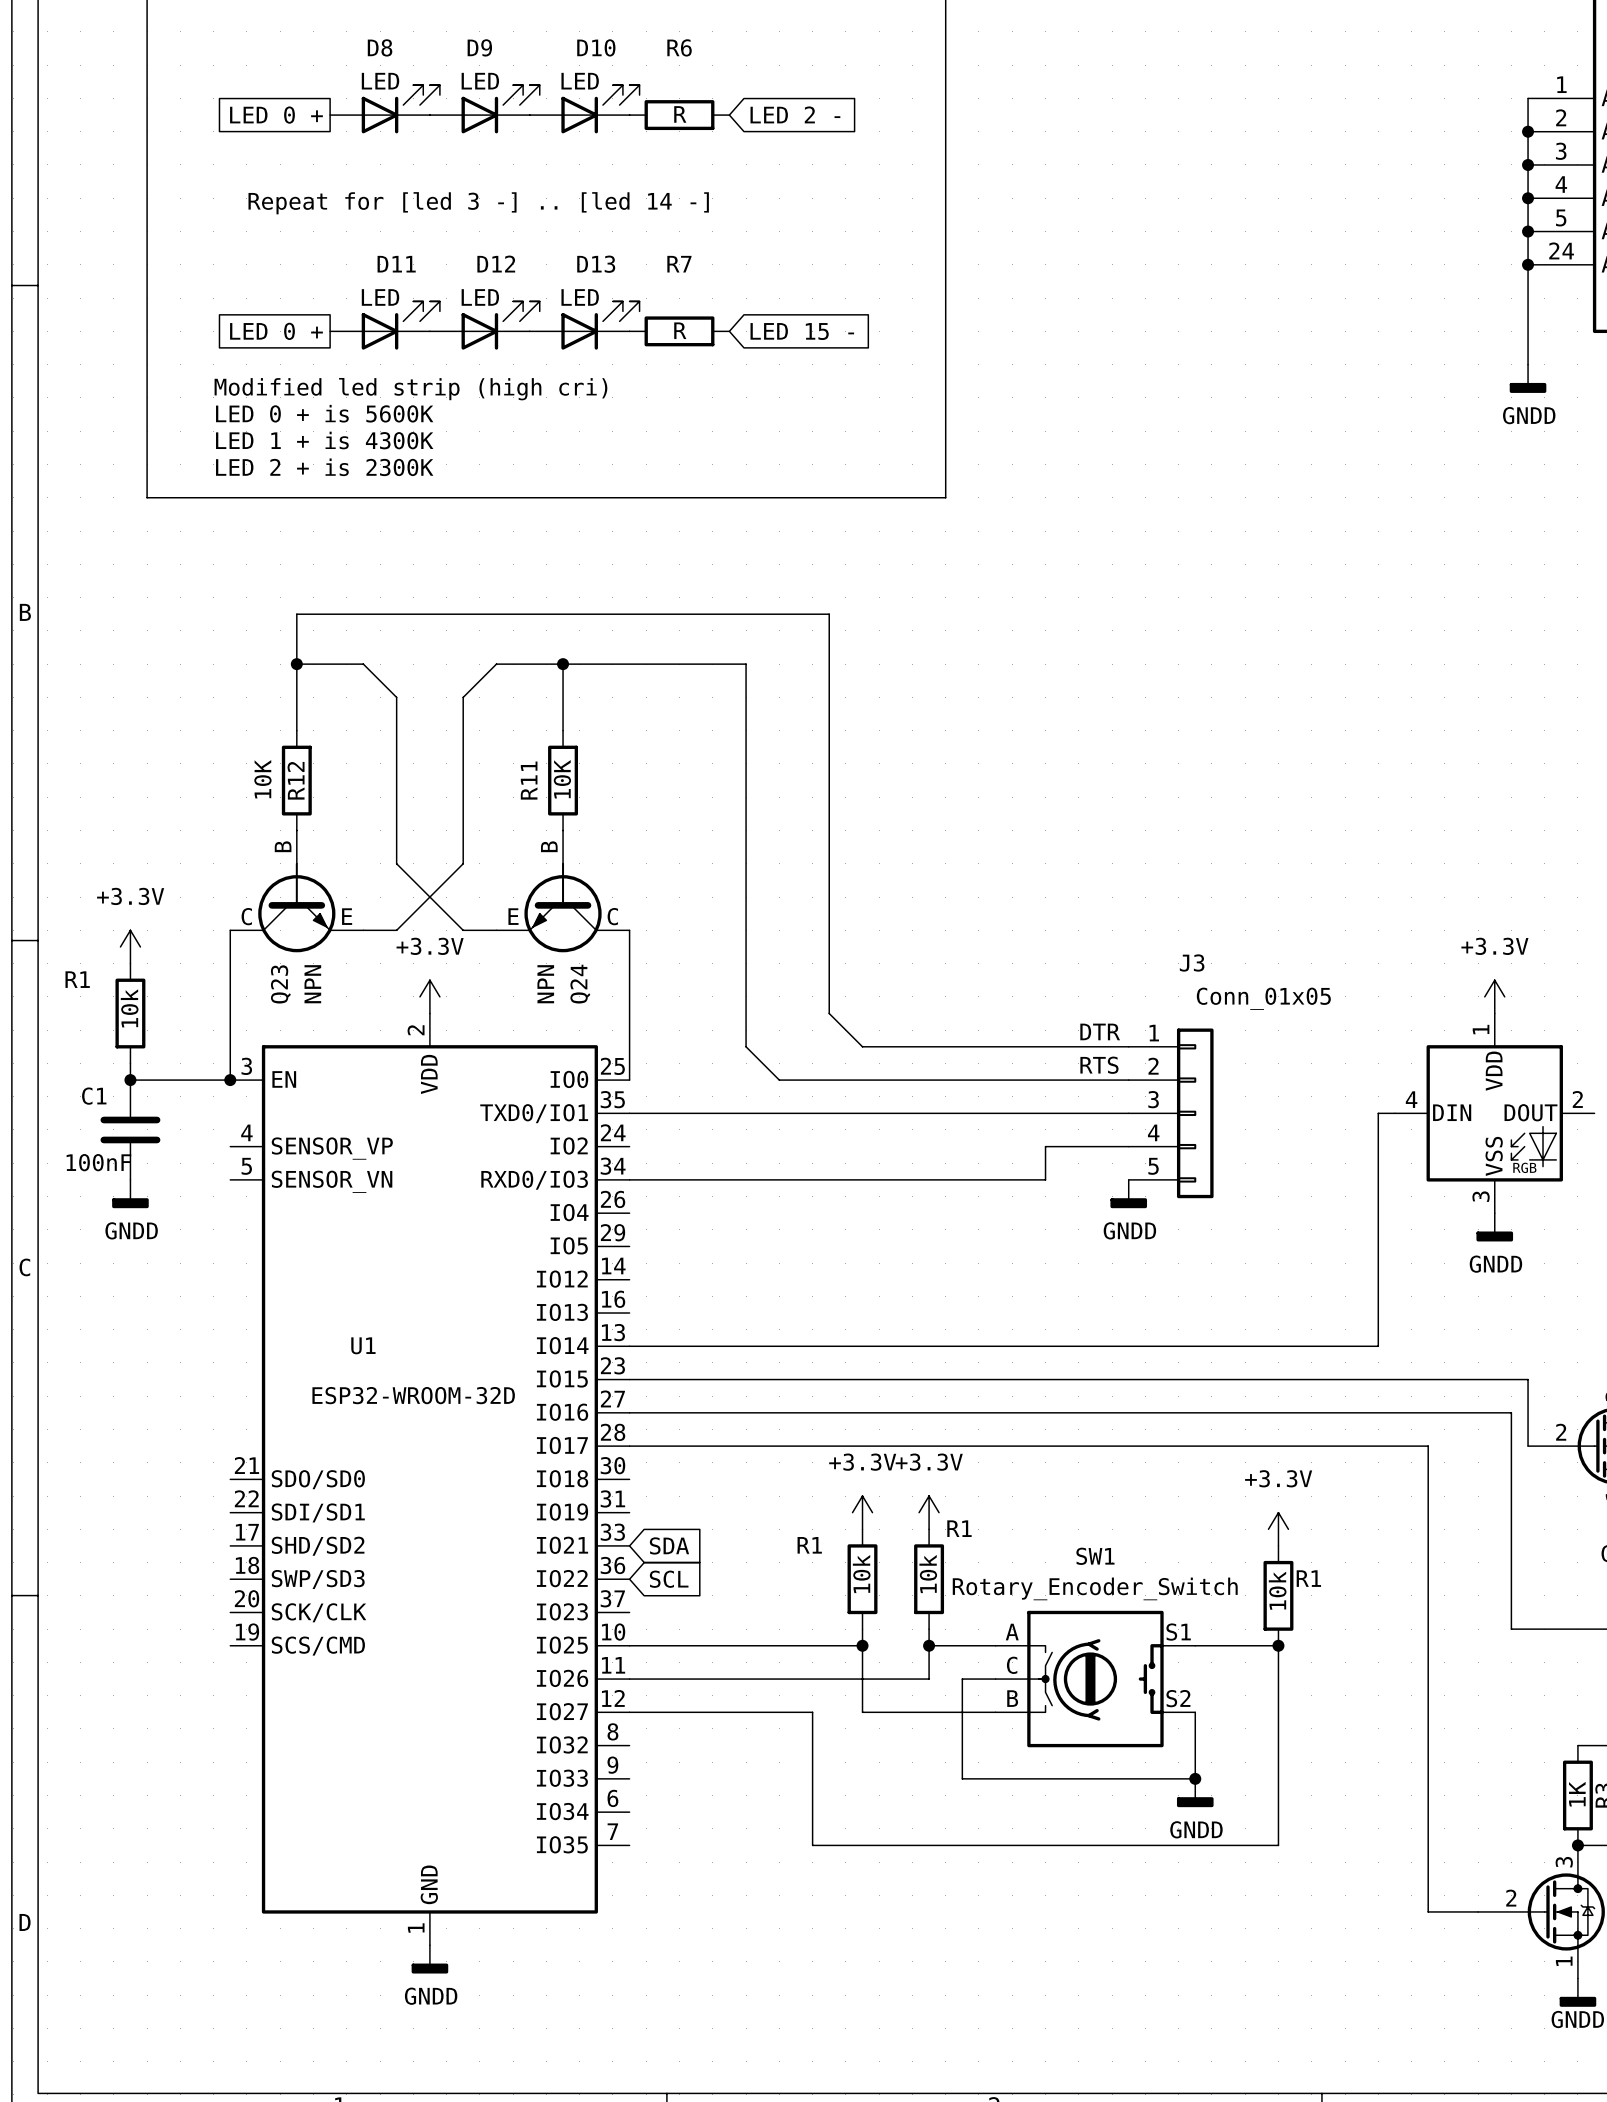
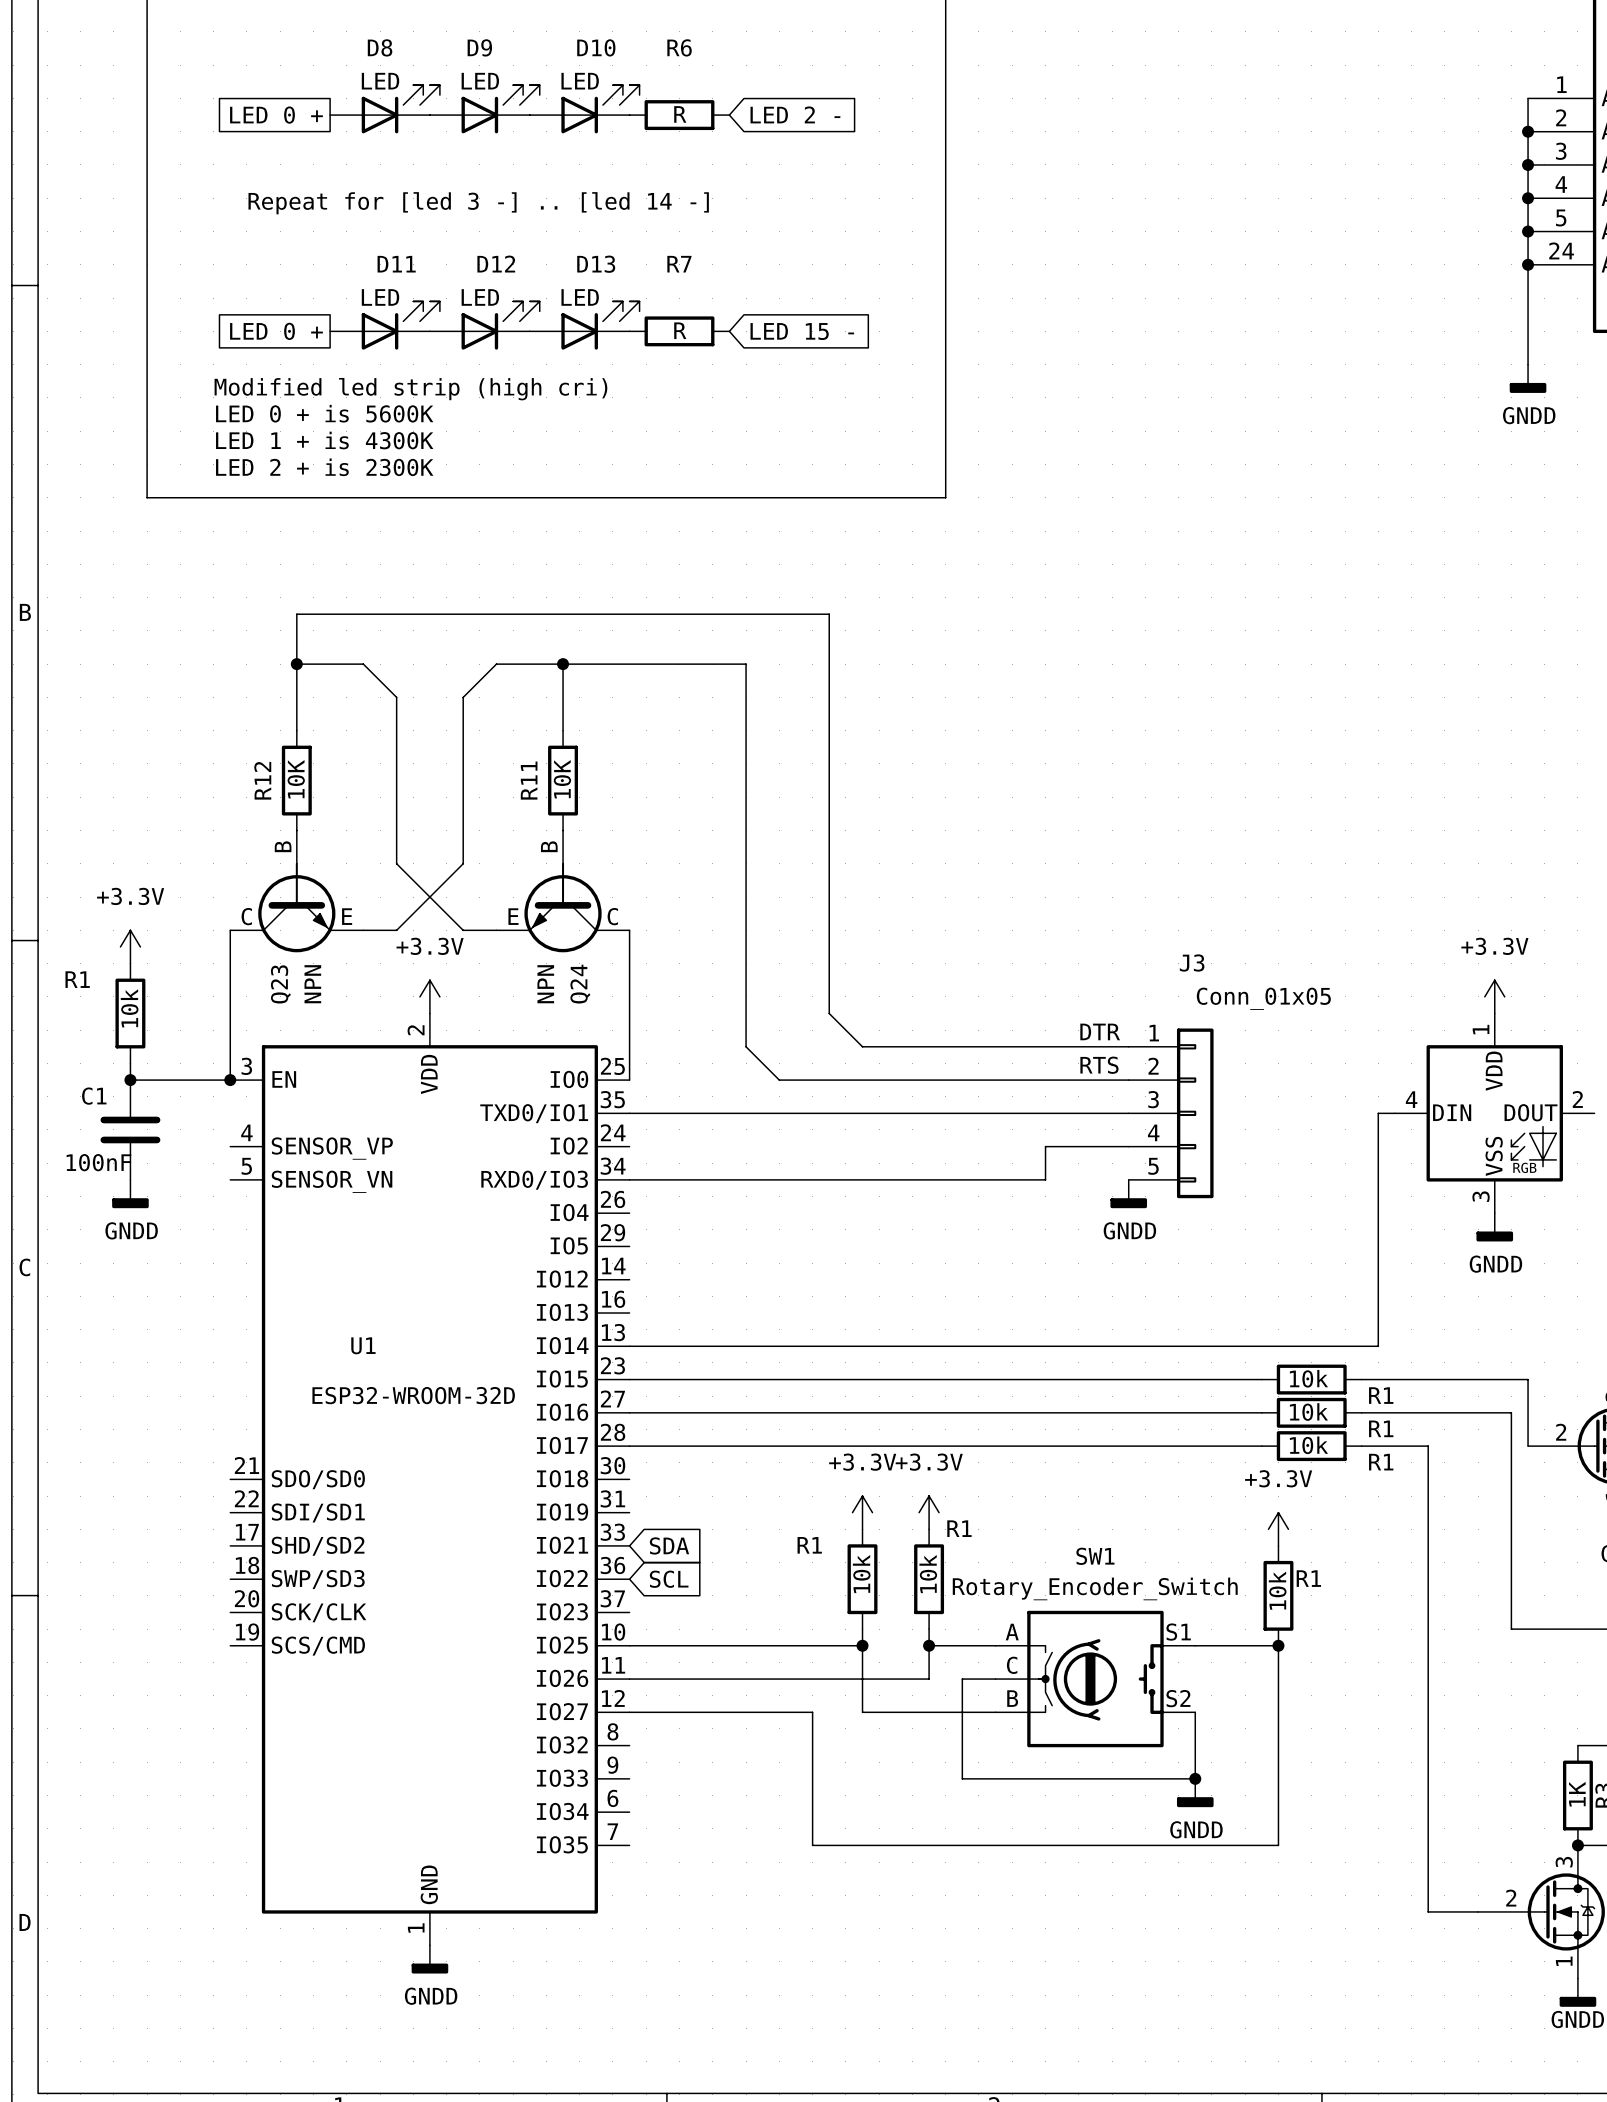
R12 value position: 10K (262, 779) -> 10K (296, 779)
R12 name position: R12 (296, 780) -> R12 (262, 780)
wire: (1261, 1379) (1361, 1379) -> none
R1: none -> 10k (1311, 1379)
wire: (1261, 1412) (1361, 1412) -> none
R1: none -> 10k (1311, 1412)
wire: (1261, 1446) (1361, 1446) -> none
R1: none -> 10k (1311, 1446)

